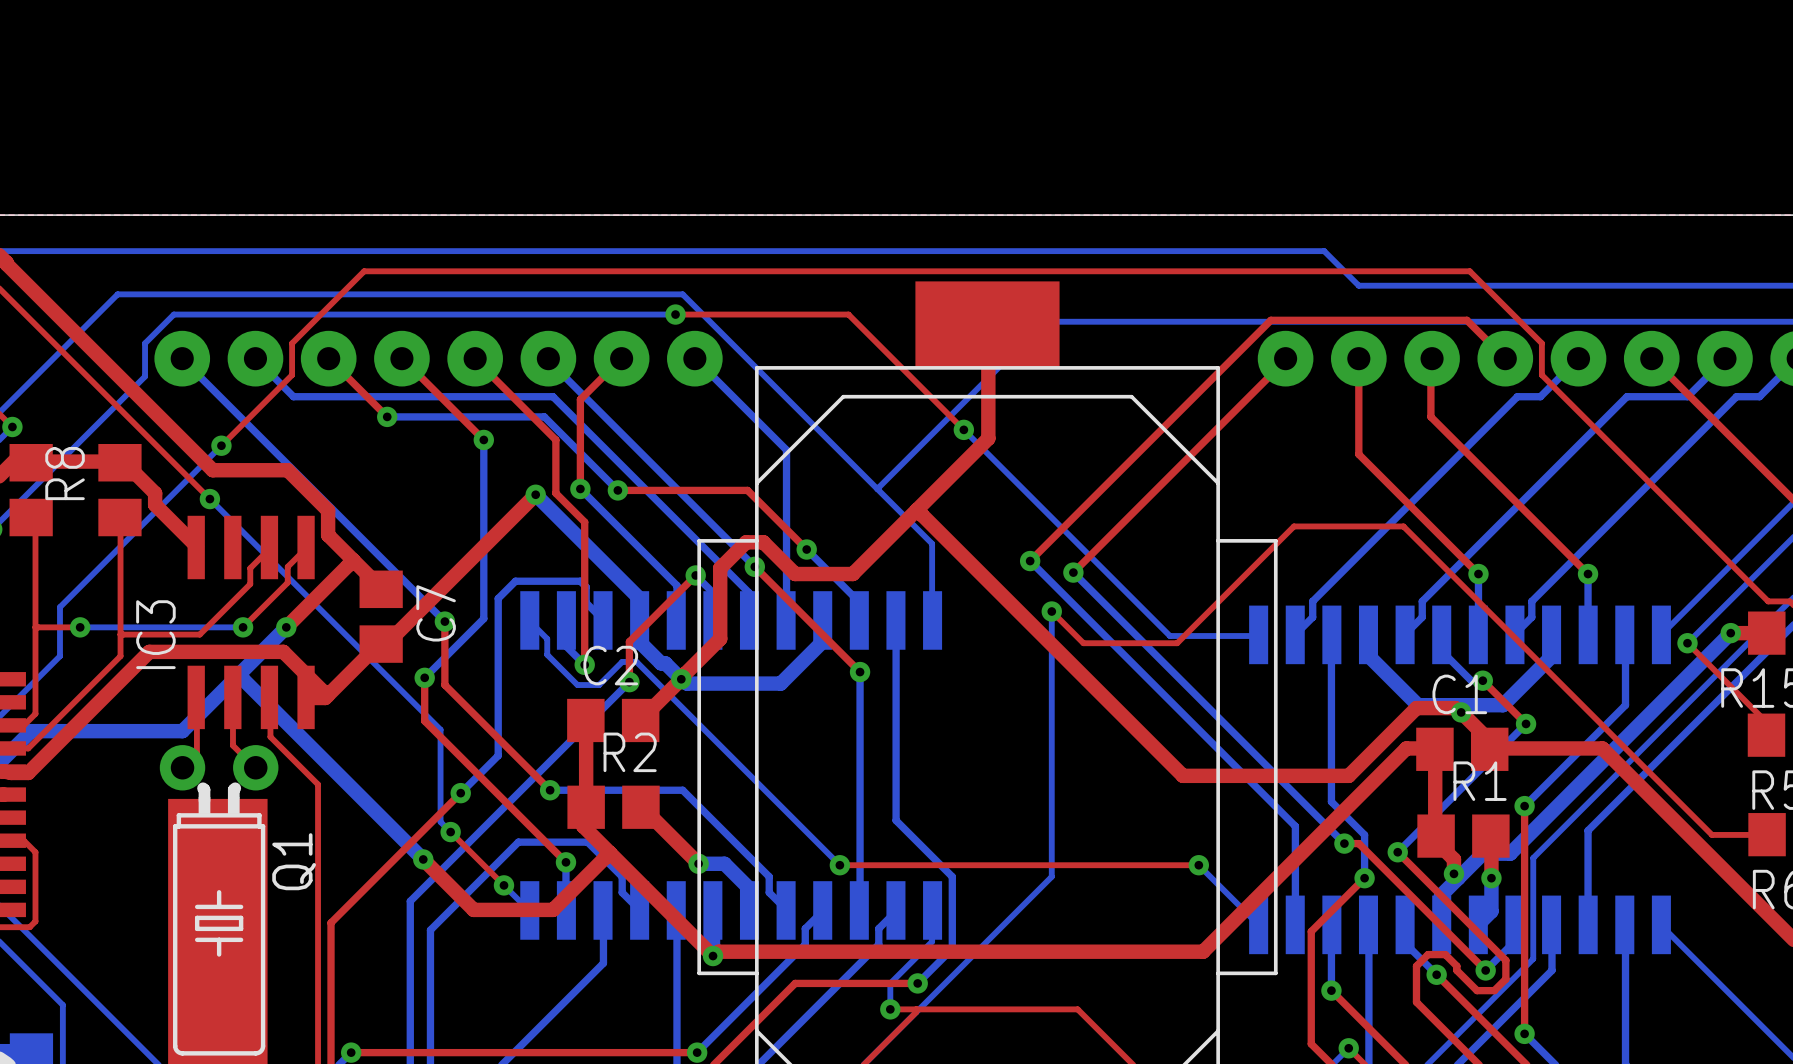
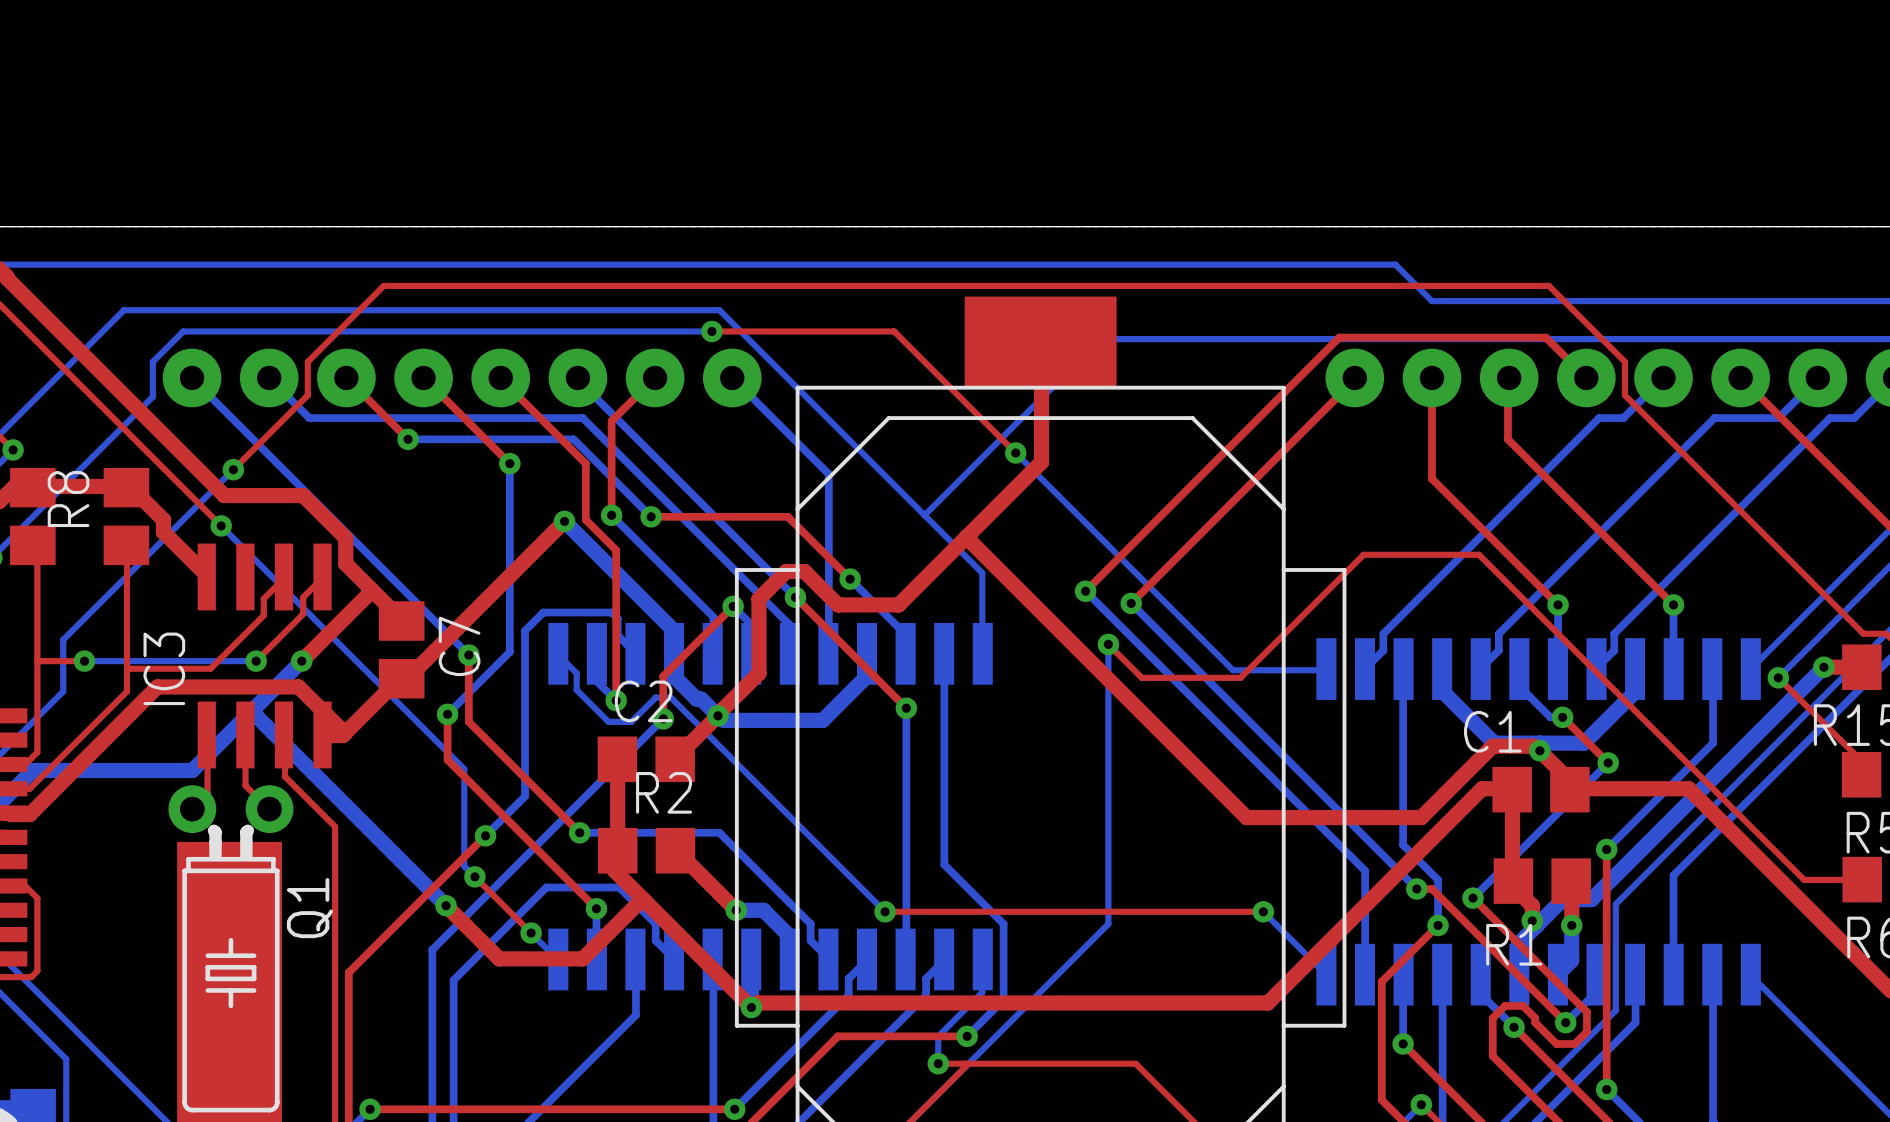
C1 name position: C1 (1459, 694) -> C1 (1492, 731)
R1 name position: R1 (1480, 781) -> R1 (1514, 944)

